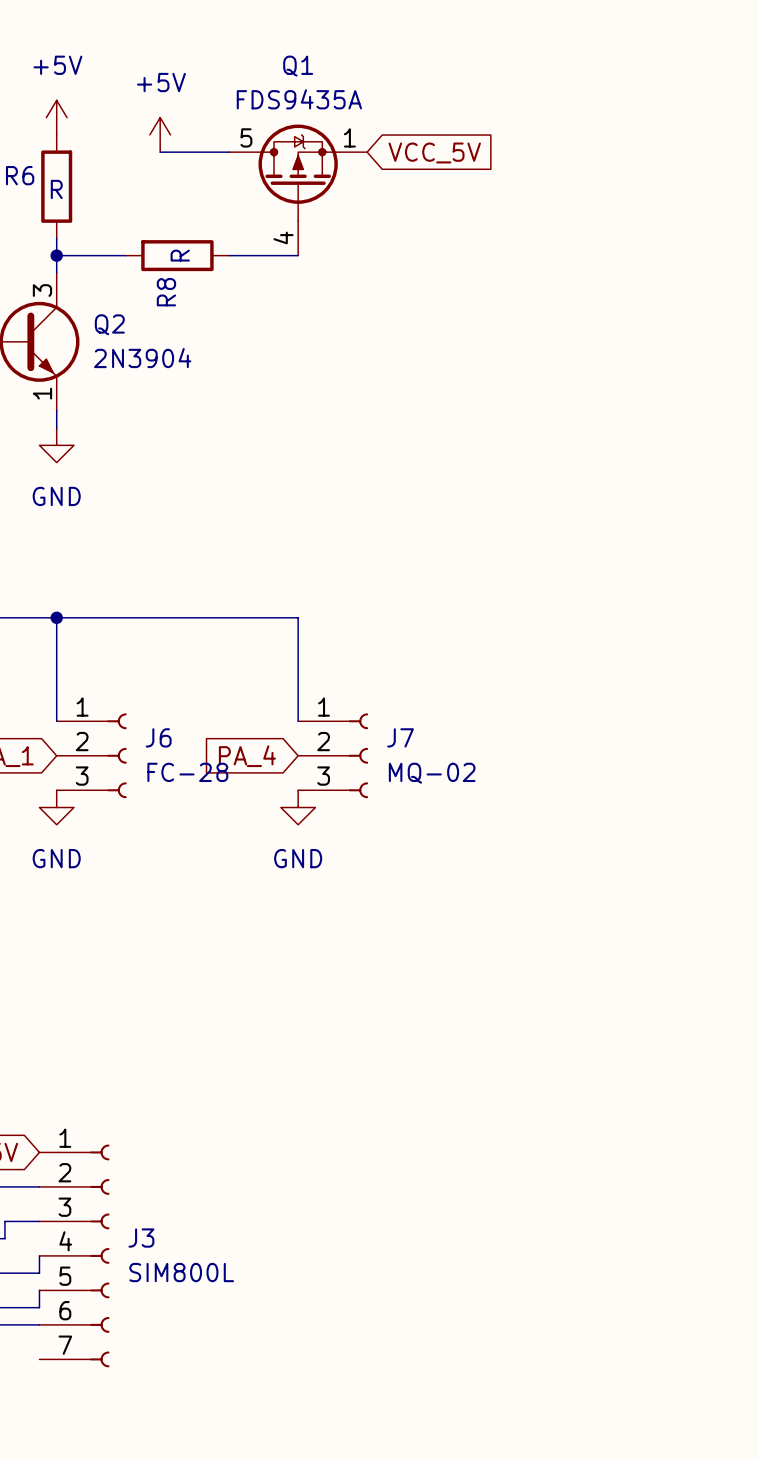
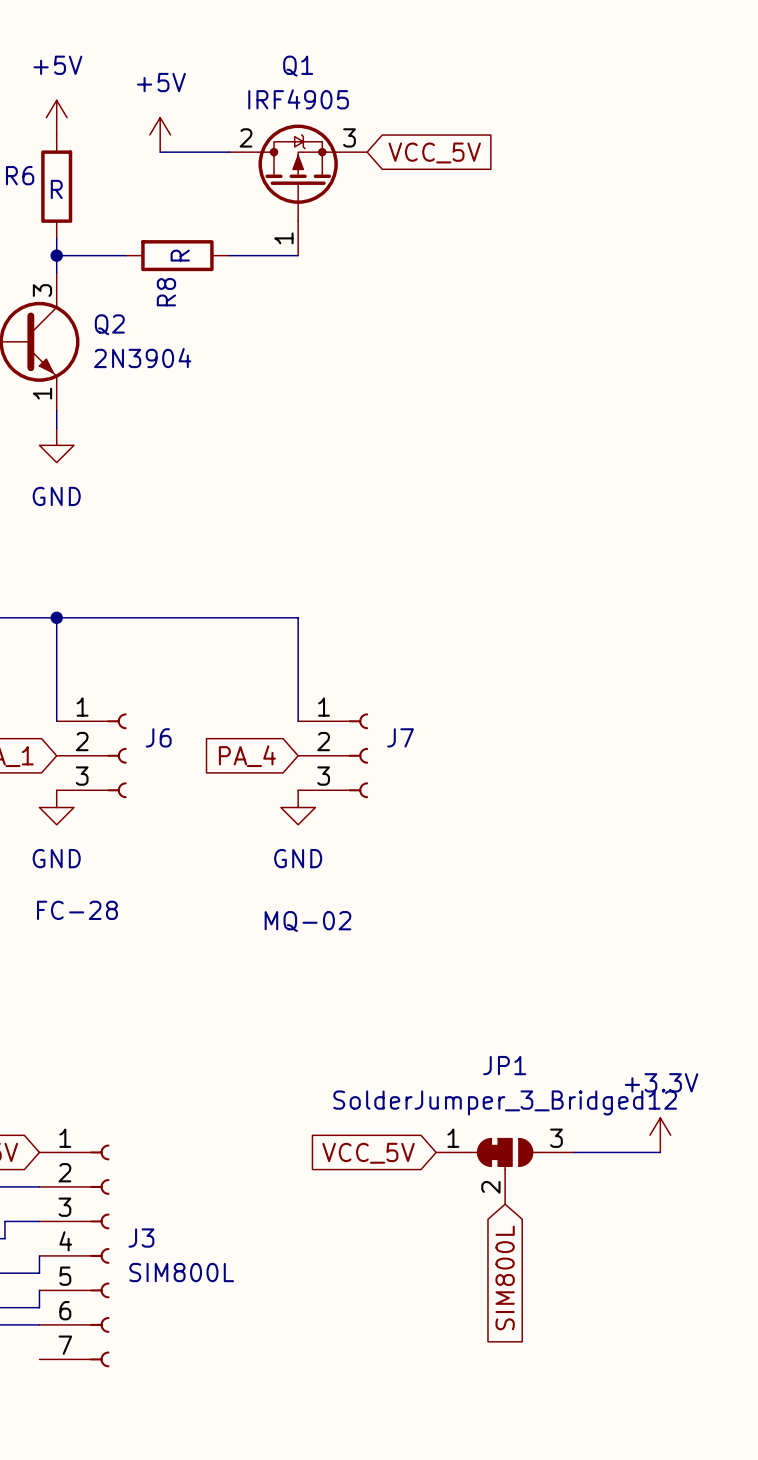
Q1 value: FDS9435A (299, 99) -> IRF4905 (298, 99)
Q1 pin number: 5 (246, 137) -> 2 (246, 137)
Q1 pin number: 1 (349, 137) -> 3 (349, 137)
Q1 pin number: 4 (283, 237) -> 1 (283, 238)
J6 value position: FC-28 (187, 772) -> FC-28 (77, 910)
J7 value position: MQ-02 (432, 773) -> MQ-02 (307, 921)
power symbol: none -> +3.3V (660, 1135)
wire: none -> (574, 1152) (660, 1152)
global label: none -> VCC_5V (368, 1153)
JP1: none -> SolderJumper_3_Bridged12 (505, 1171)
global label: none -> SIM800L (505, 1277)

